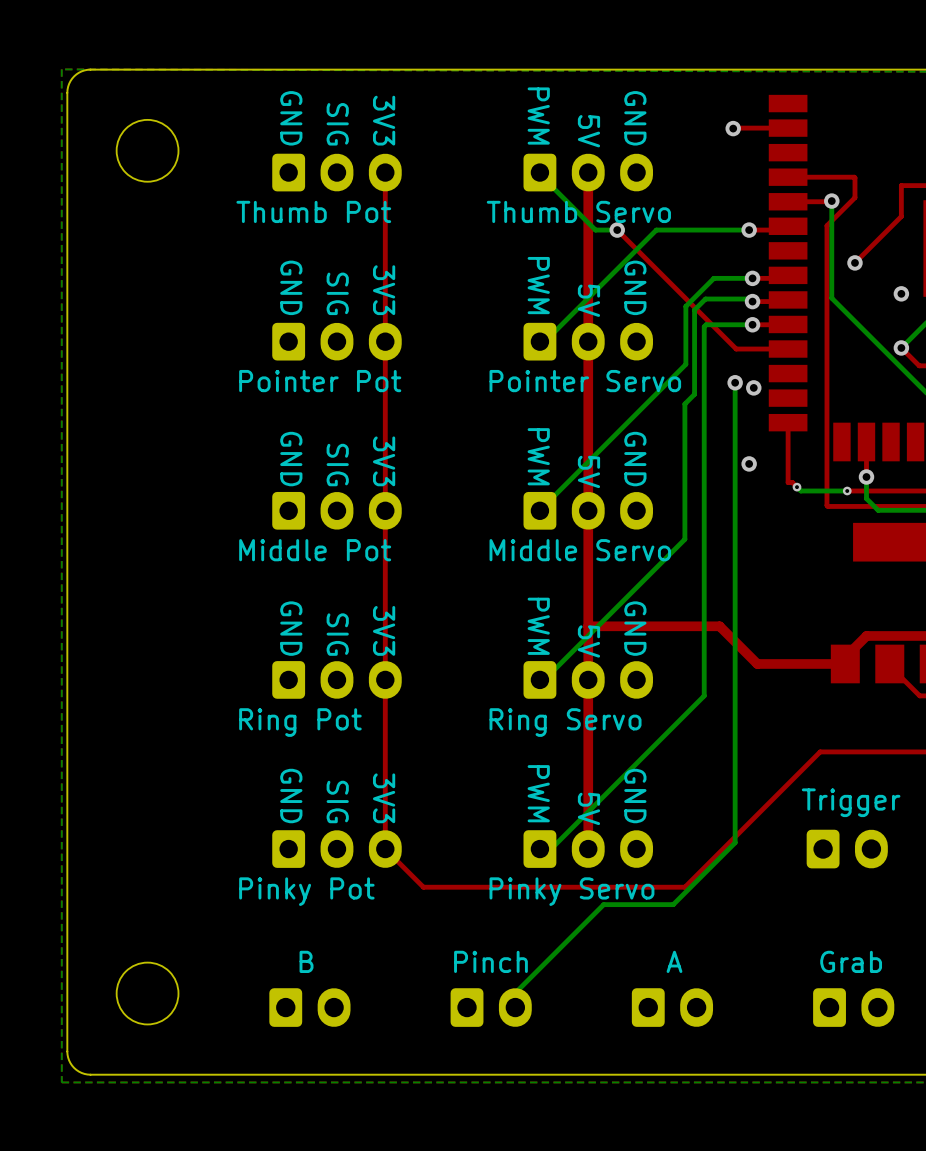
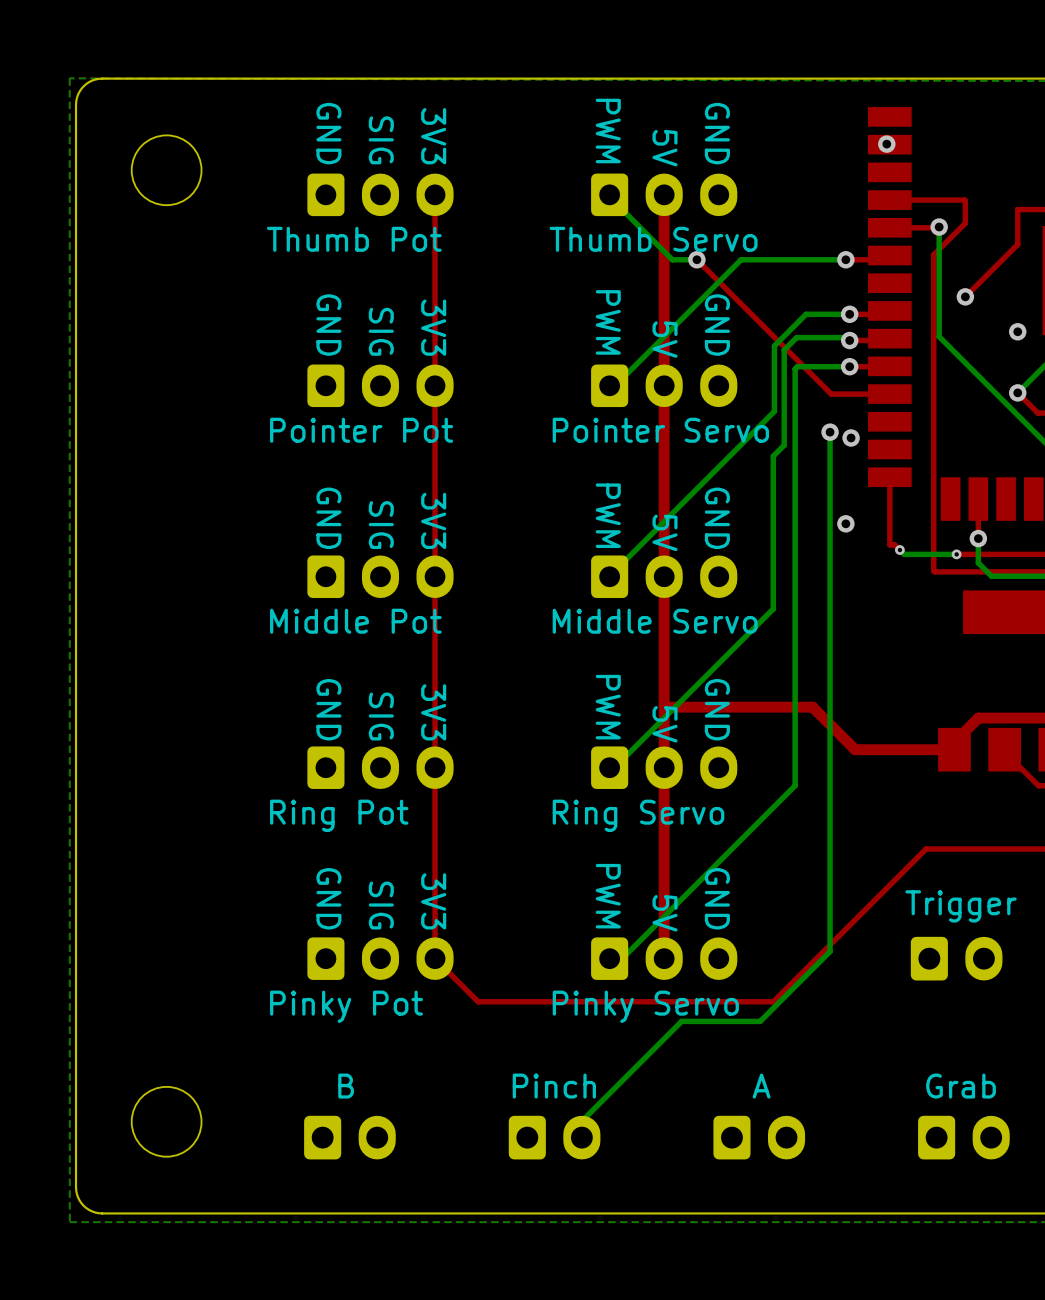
via position: (733, 128) -> (886, 144)
top track: (788, 128) (733, 128) -> none

